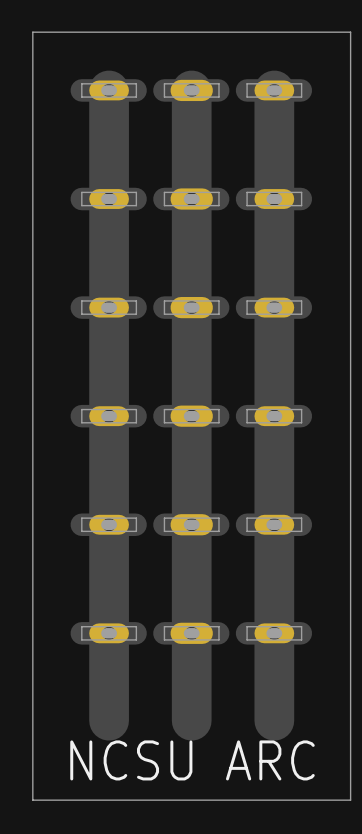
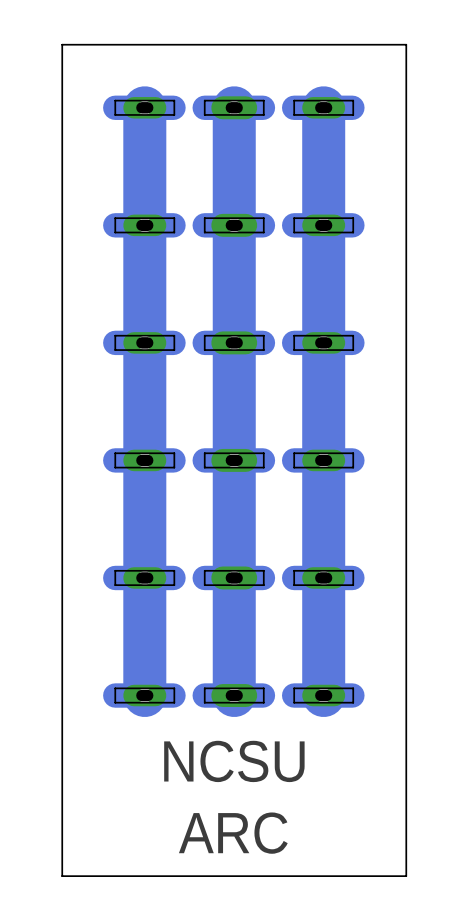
track: (109, 633) (109, 720) -> none
track: (191, 633) (191, 720) -> none
track: (274, 633) (274, 720) -> none
text: none -> NCSU (234, 761)
text: NCSU ARC (192, 760) -> ARC (233, 833)

